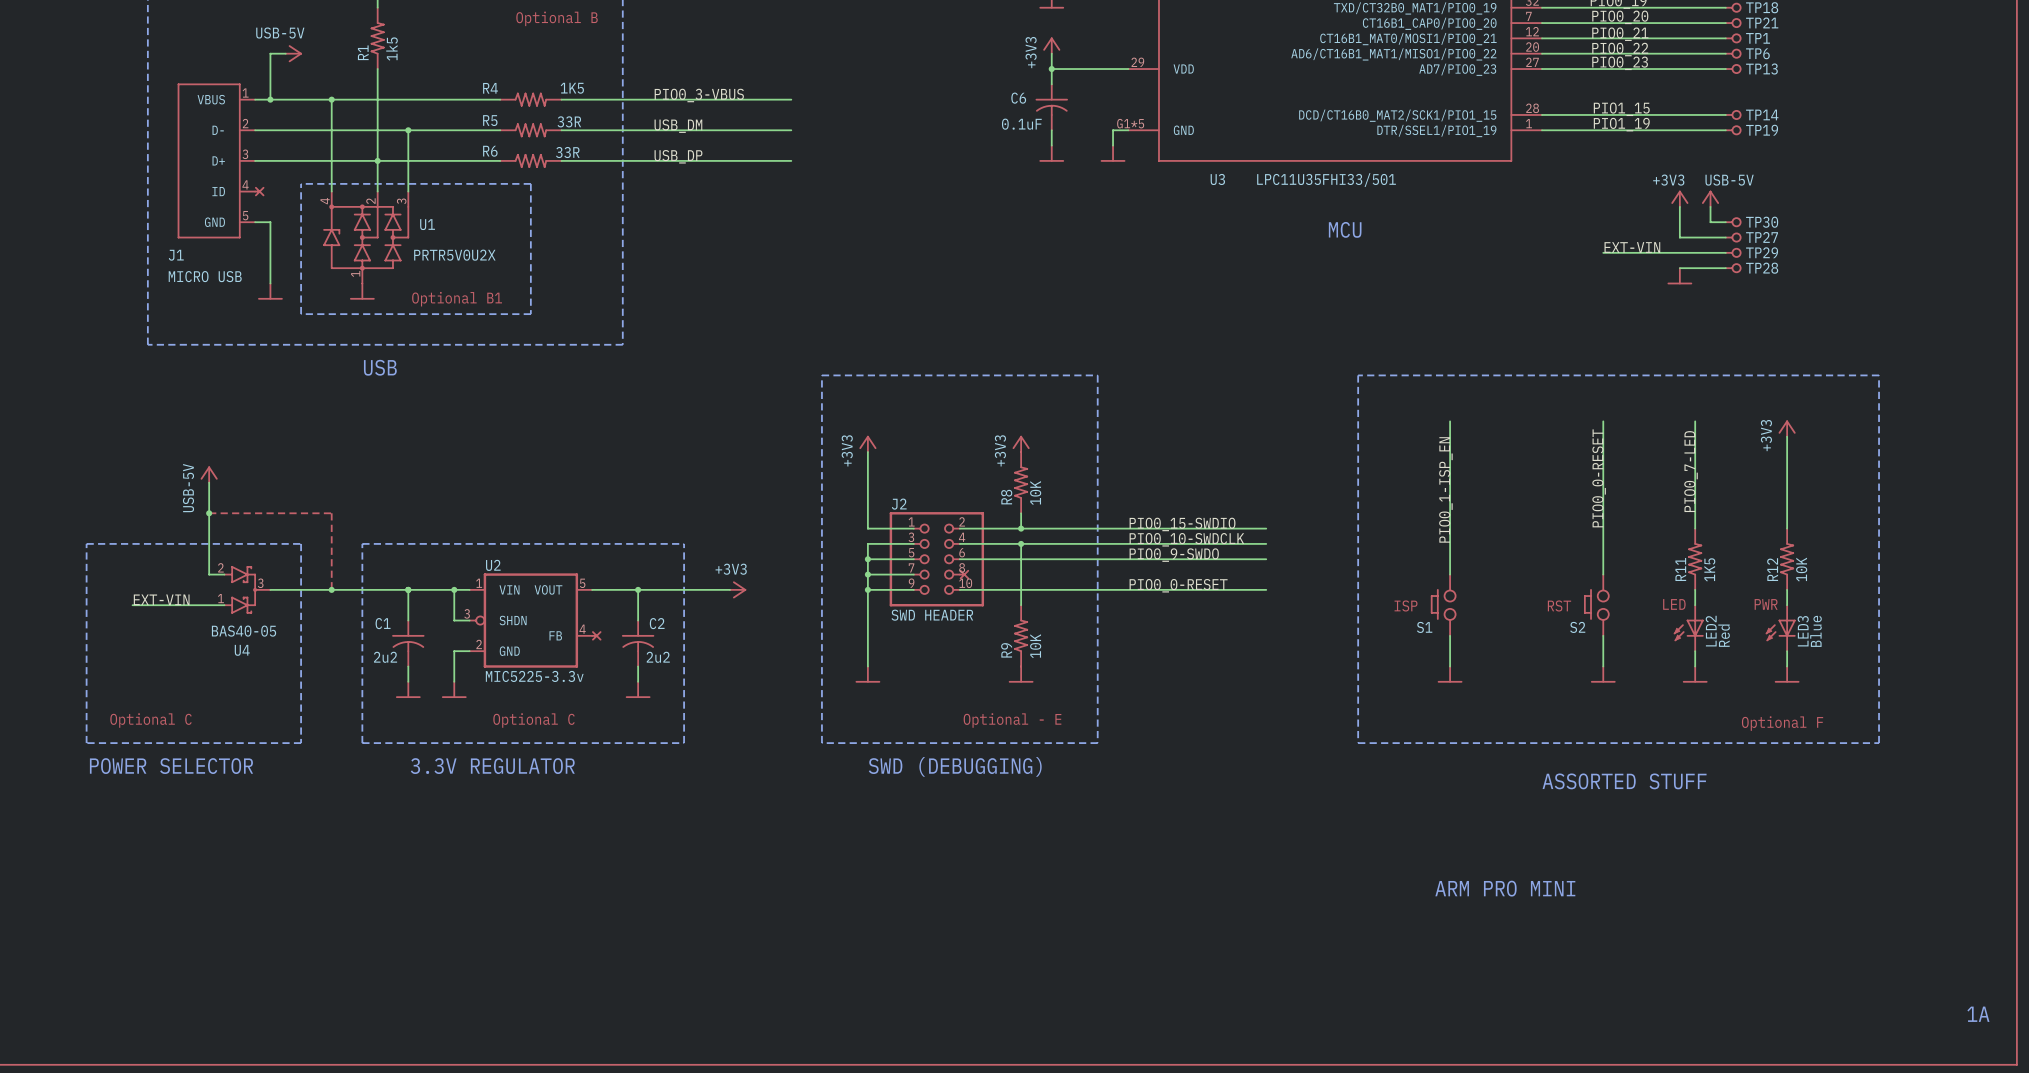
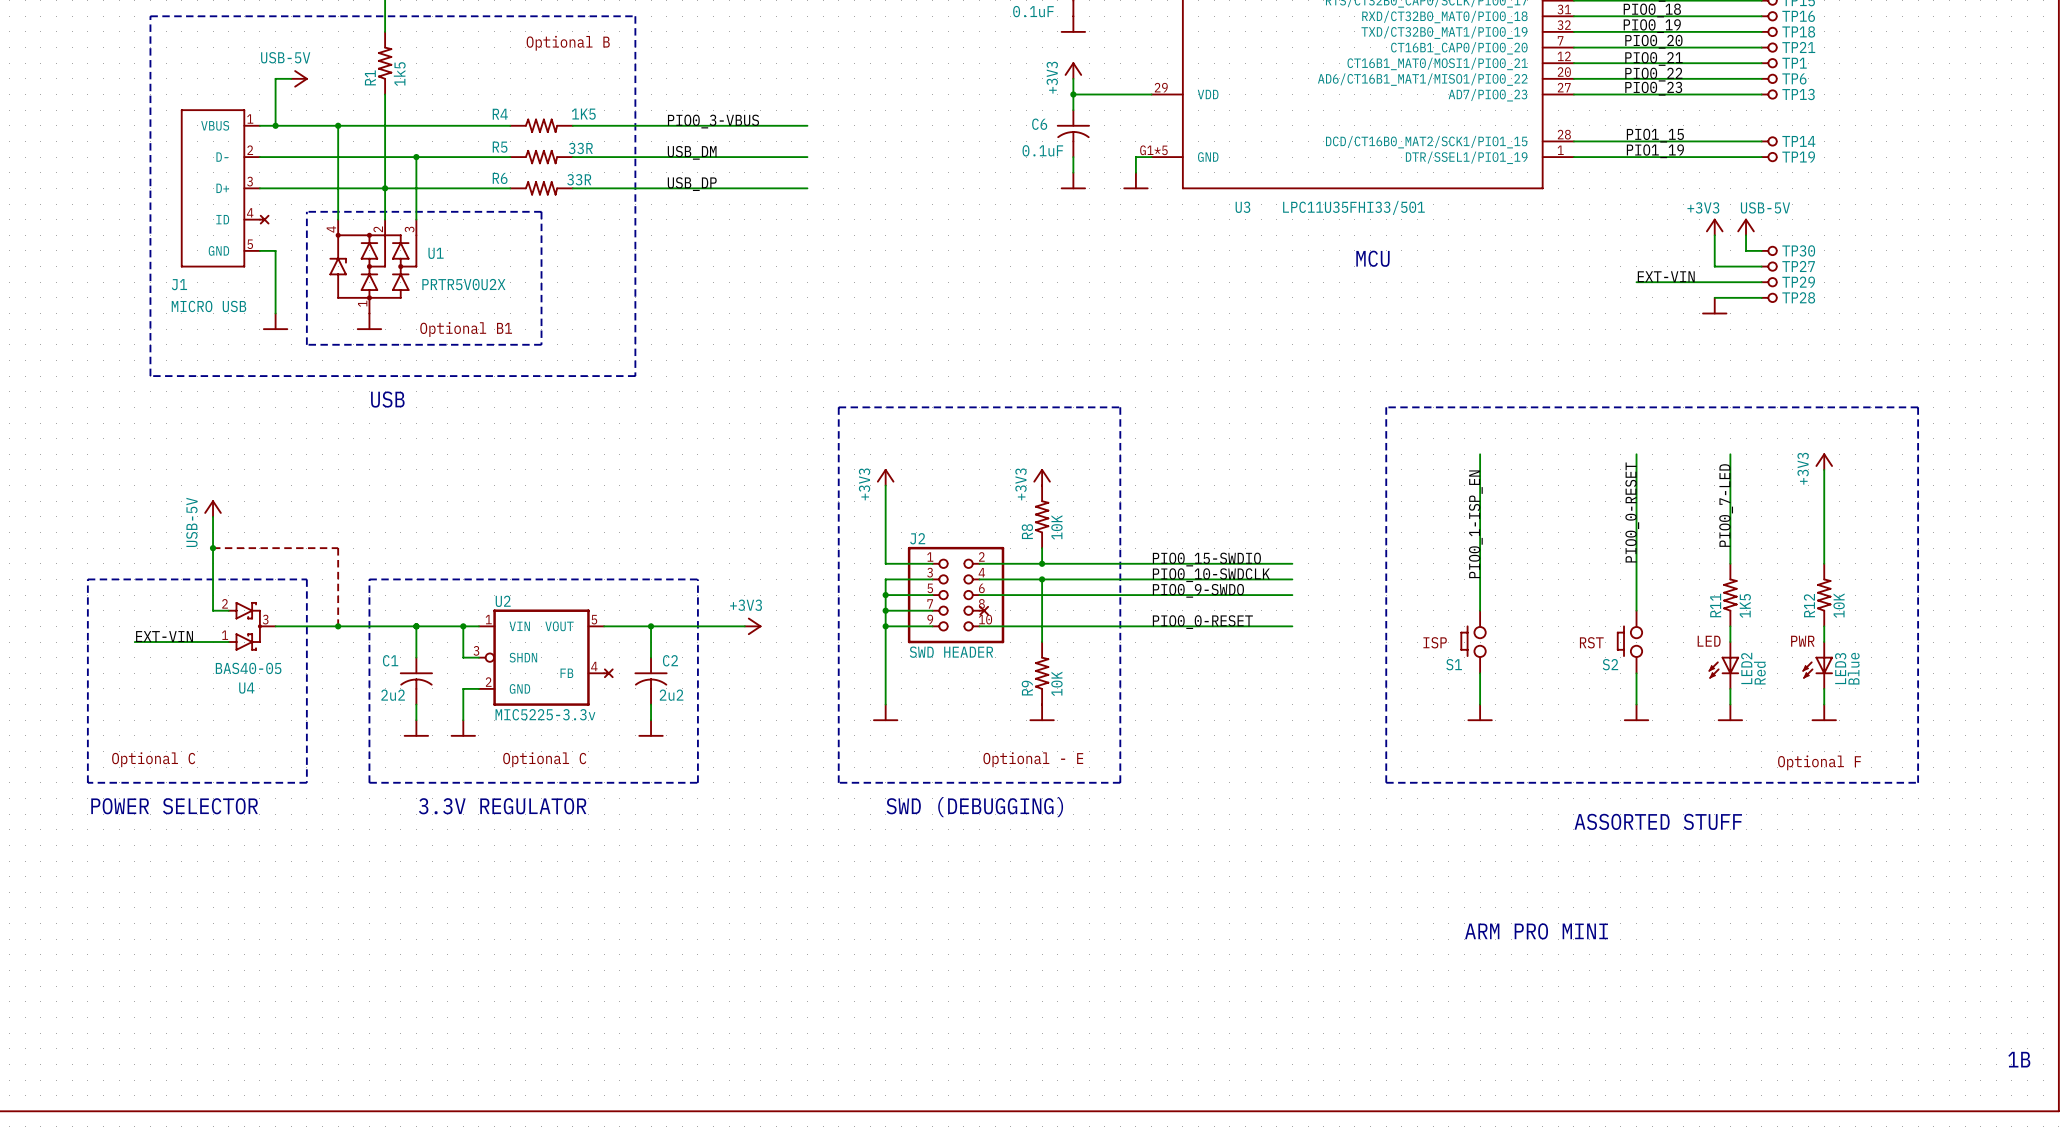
text: 1A (1978, 1014) -> 1B (2019, 1059)

